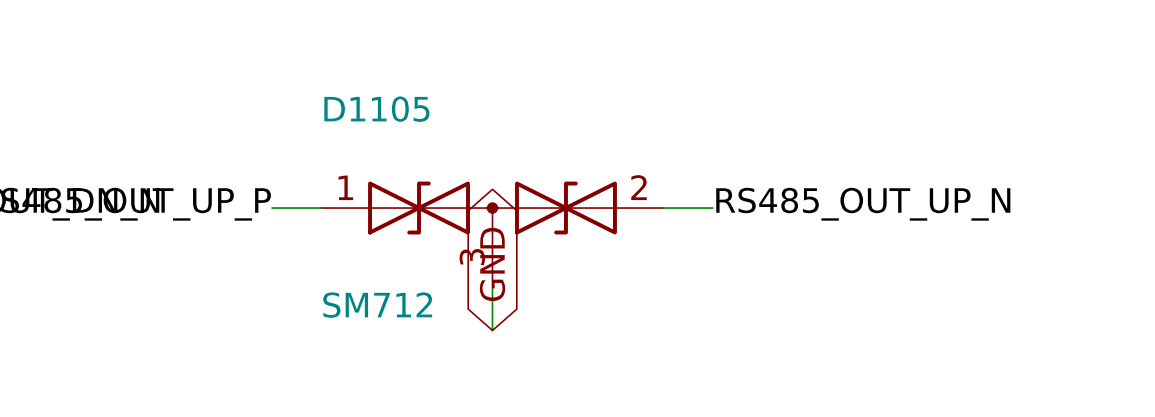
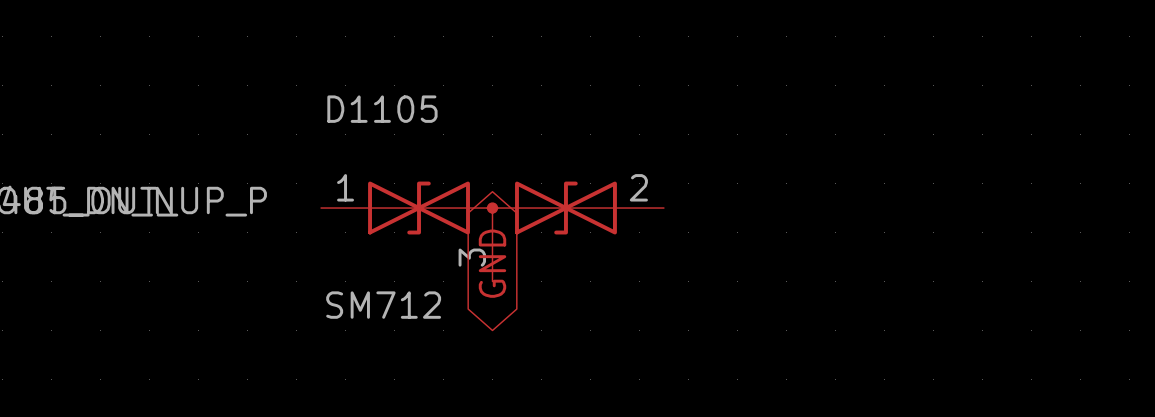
label: RS485_OUT_UP_N (863, 204) -> none
wire: (272, 208) (321, 208) -> none
wire: (663, 208) (712, 208) -> none
wire: (492, 281) (492, 330) -> none

